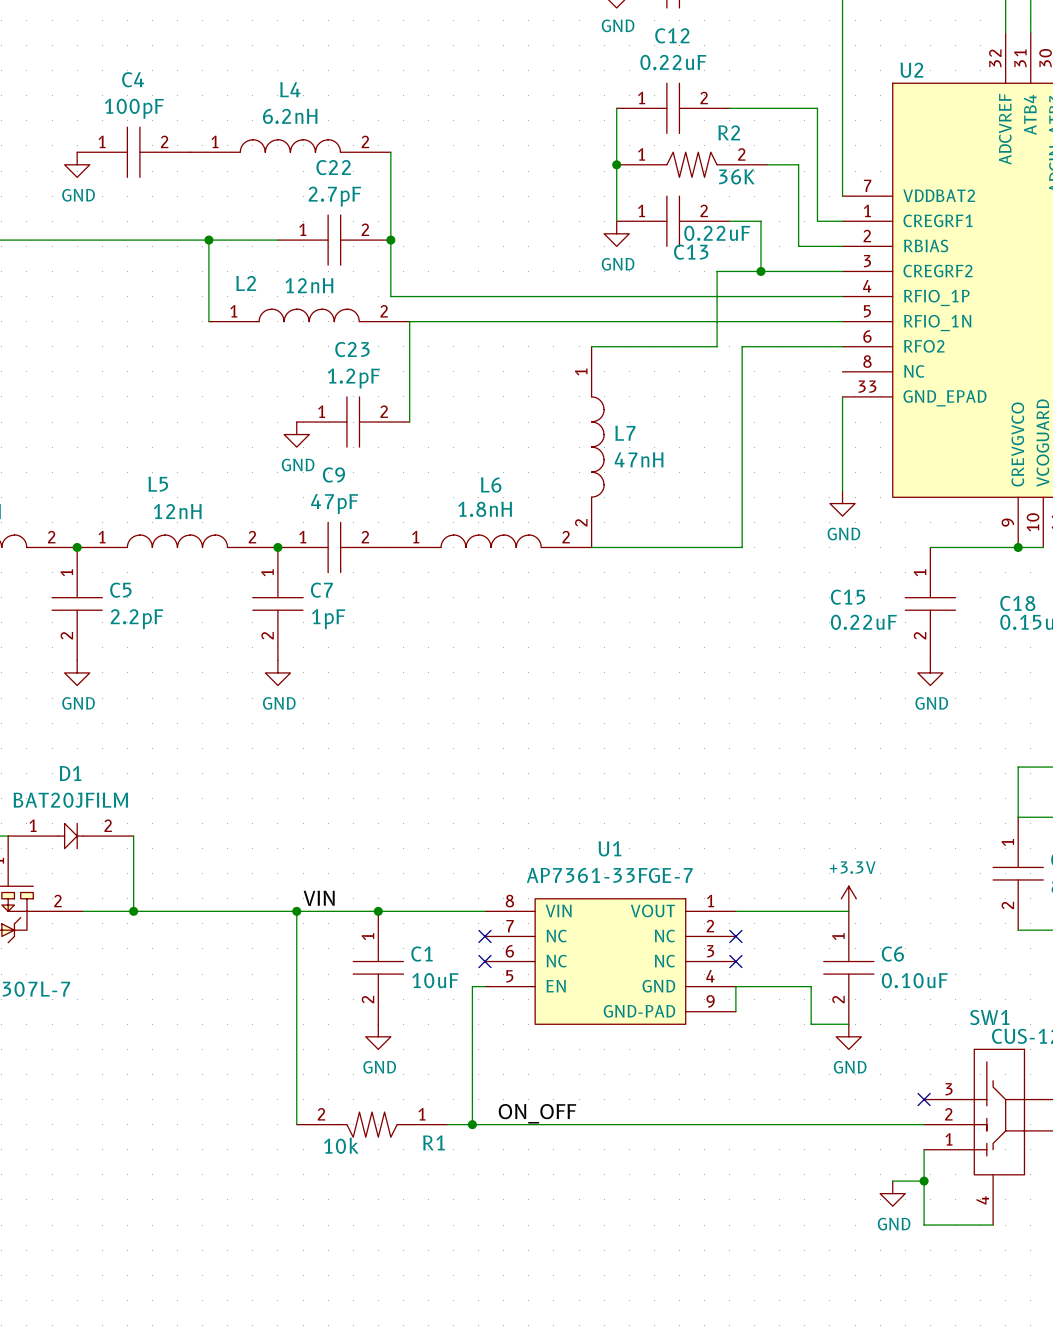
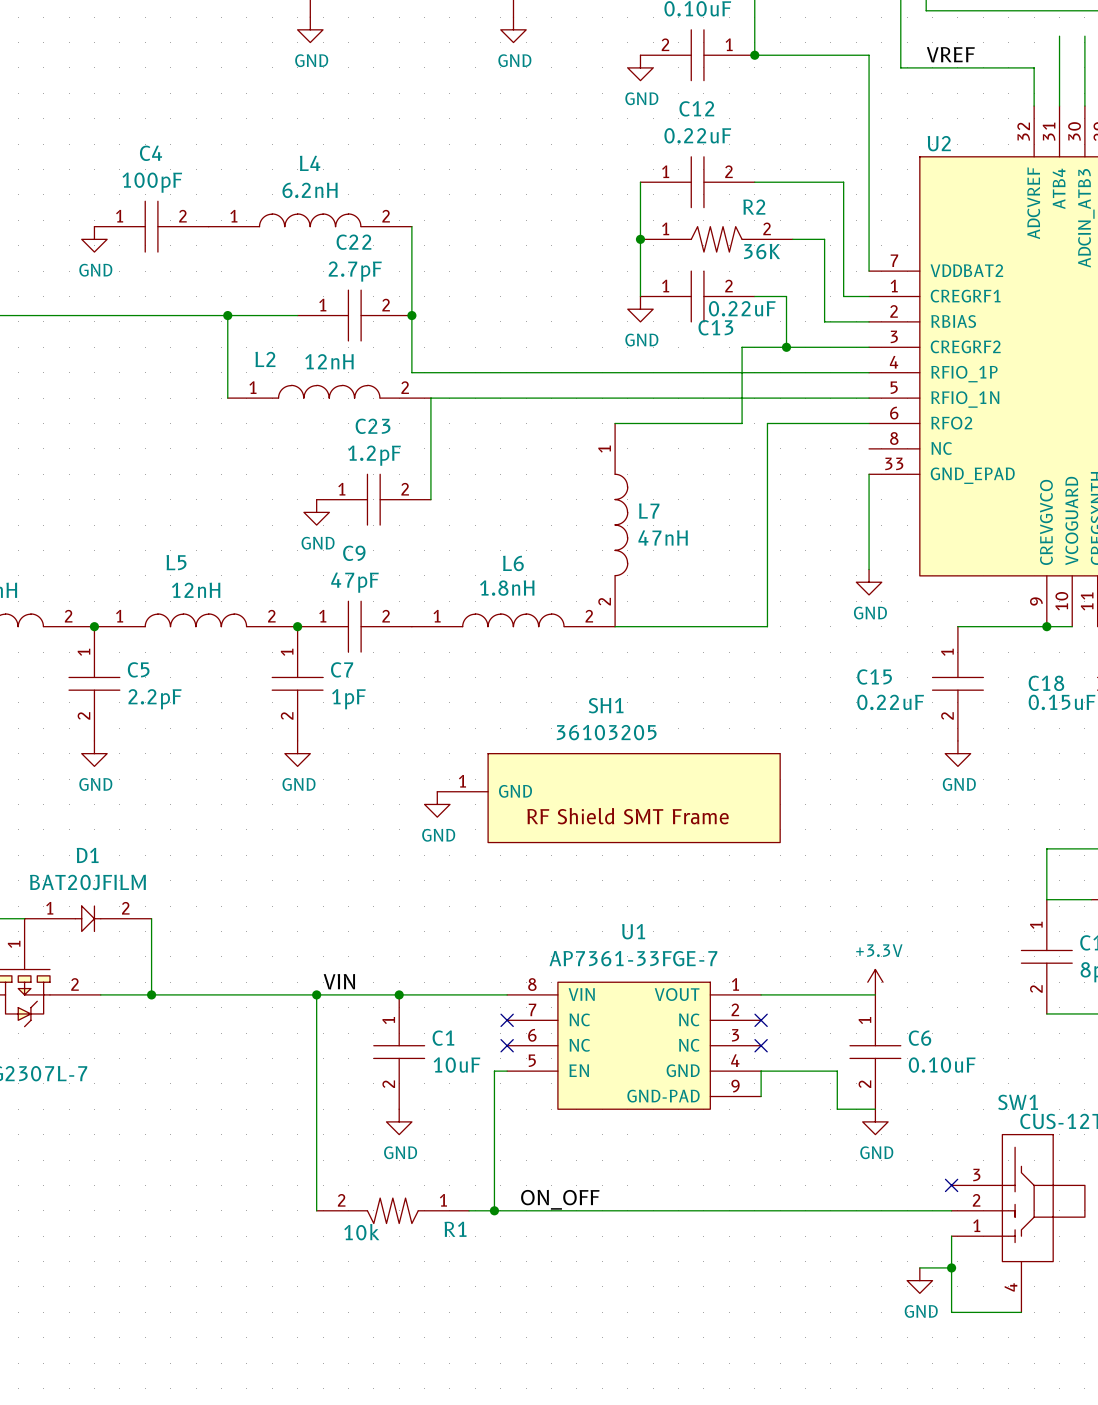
SH1: none -> 36103205 (608, 798)
power symbol: none -> GND (437, 804)

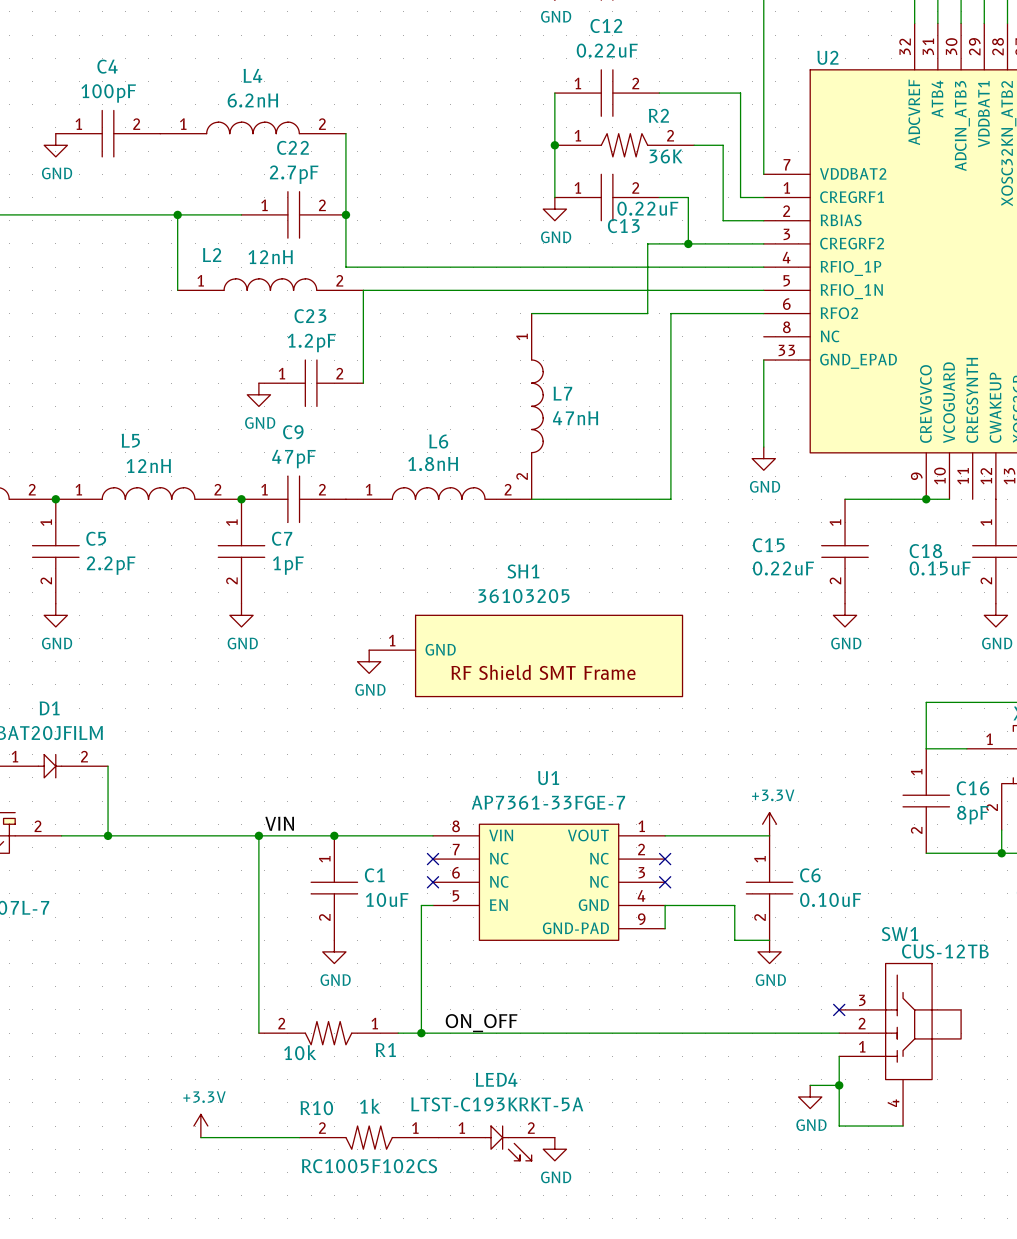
power symbol: none -> +3.3V (200, 1126)
wire: none -> (200, 1137) (299, 1137)
R10: none -> RC1005F102CS (369, 1137)
LED4: none -> LTST-C193KRKT-5A (496, 1143)
power symbol: none -> GND (554, 1149)

